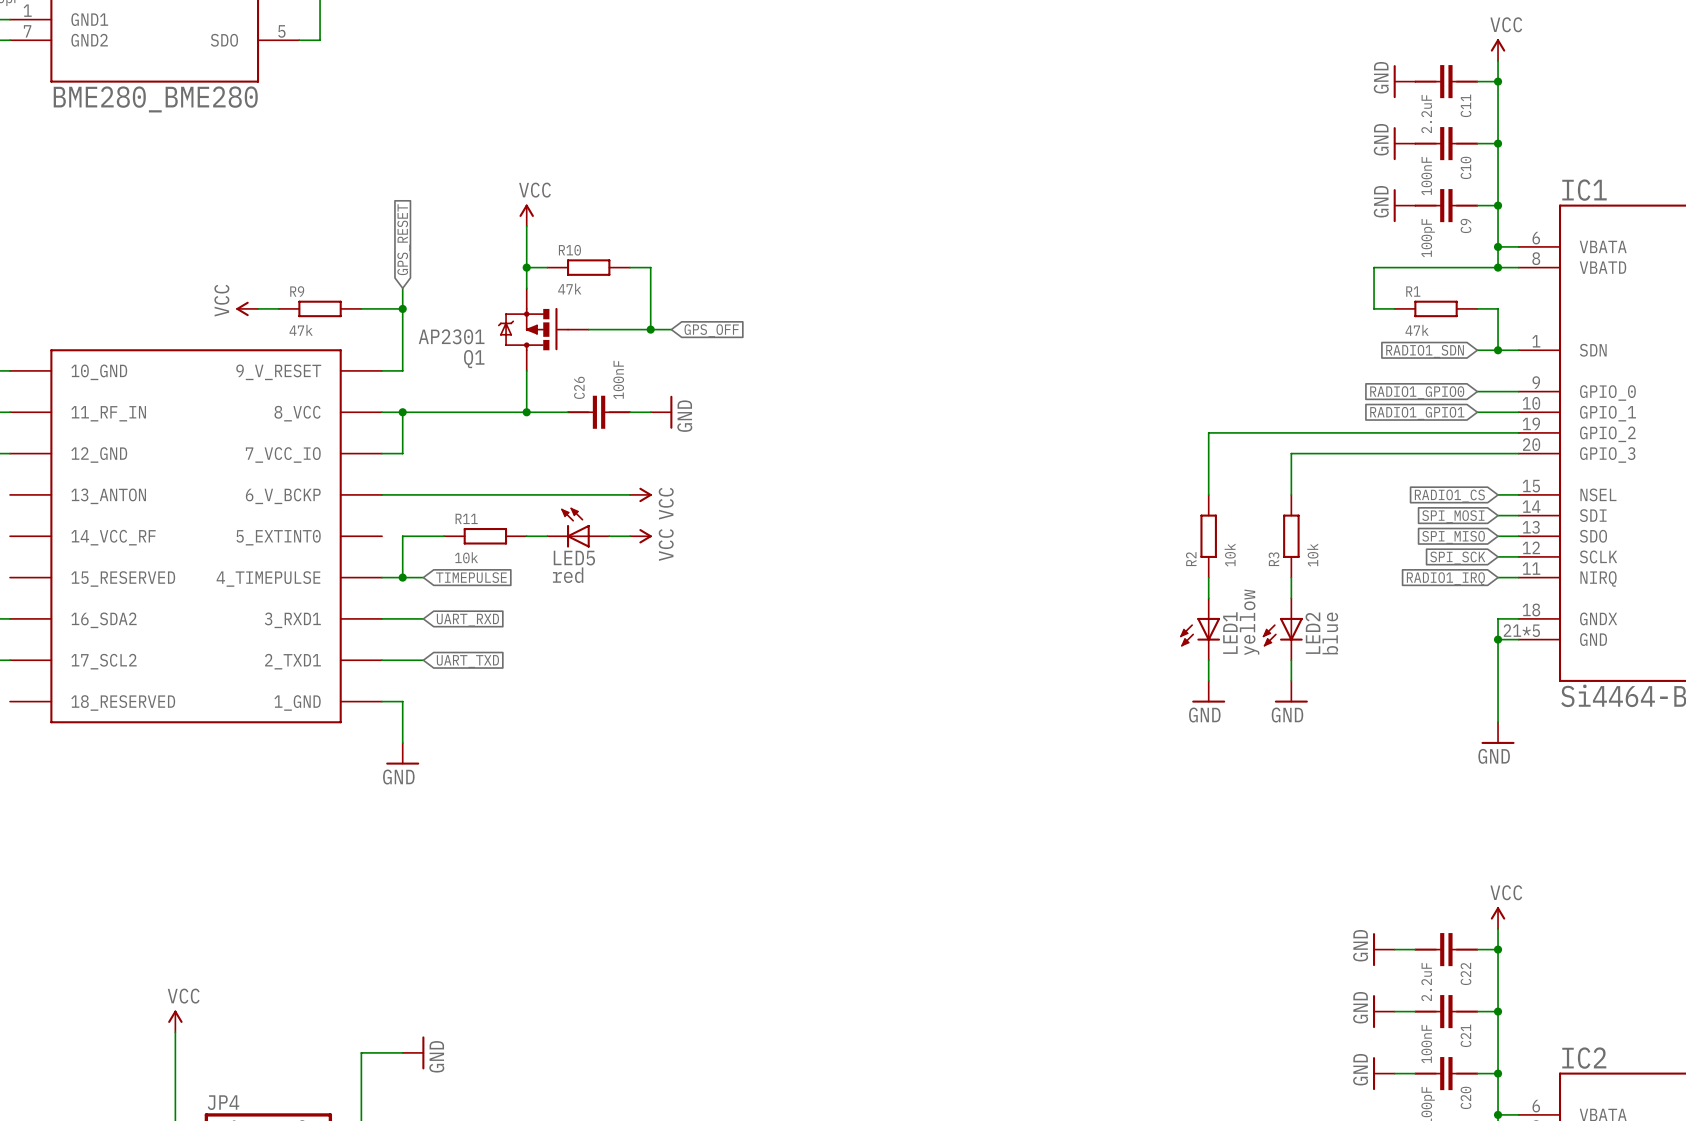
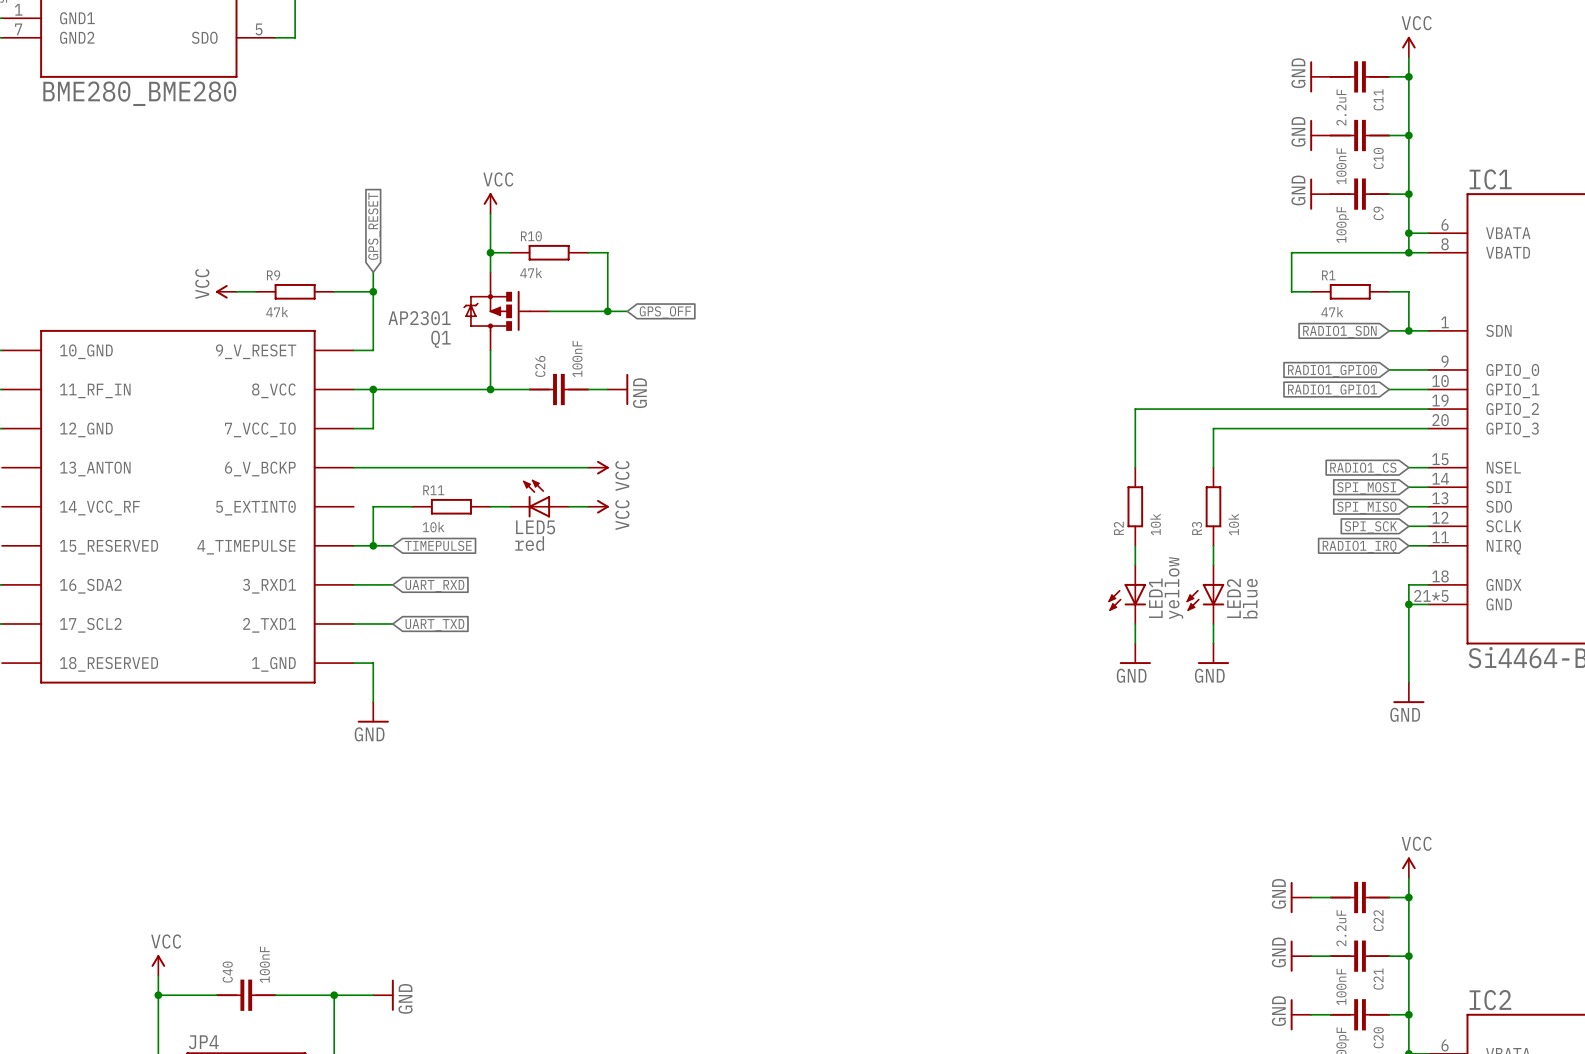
wire: none -> (158, 995) (216, 995)
junction: none -> (158, 995)
C40: none -> 100nF (246, 995)
wire: none -> (275, 995) (334, 995)
junction: none -> (334, 995)

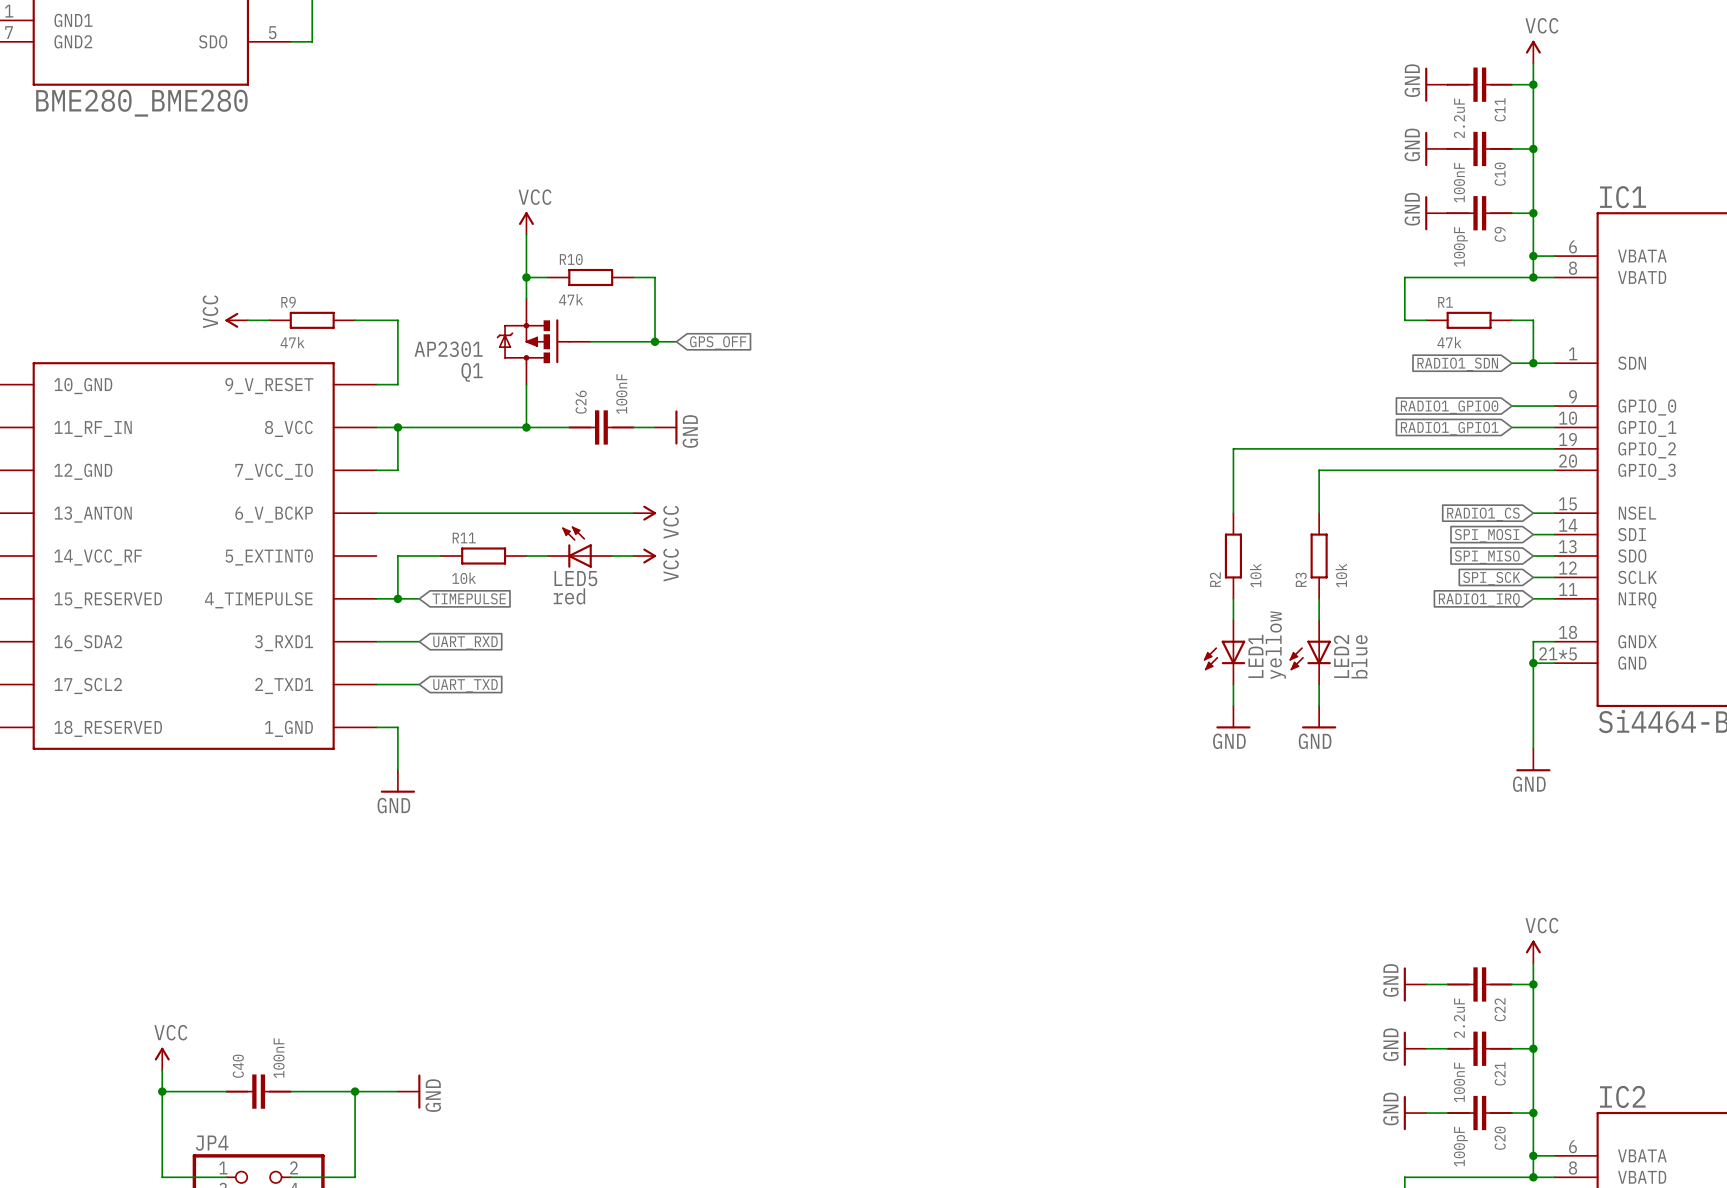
global label: GPS_RESET (374, 226) -> none
wire: (373, 272) (373, 291) -> none
junction: (373, 291) -> none

